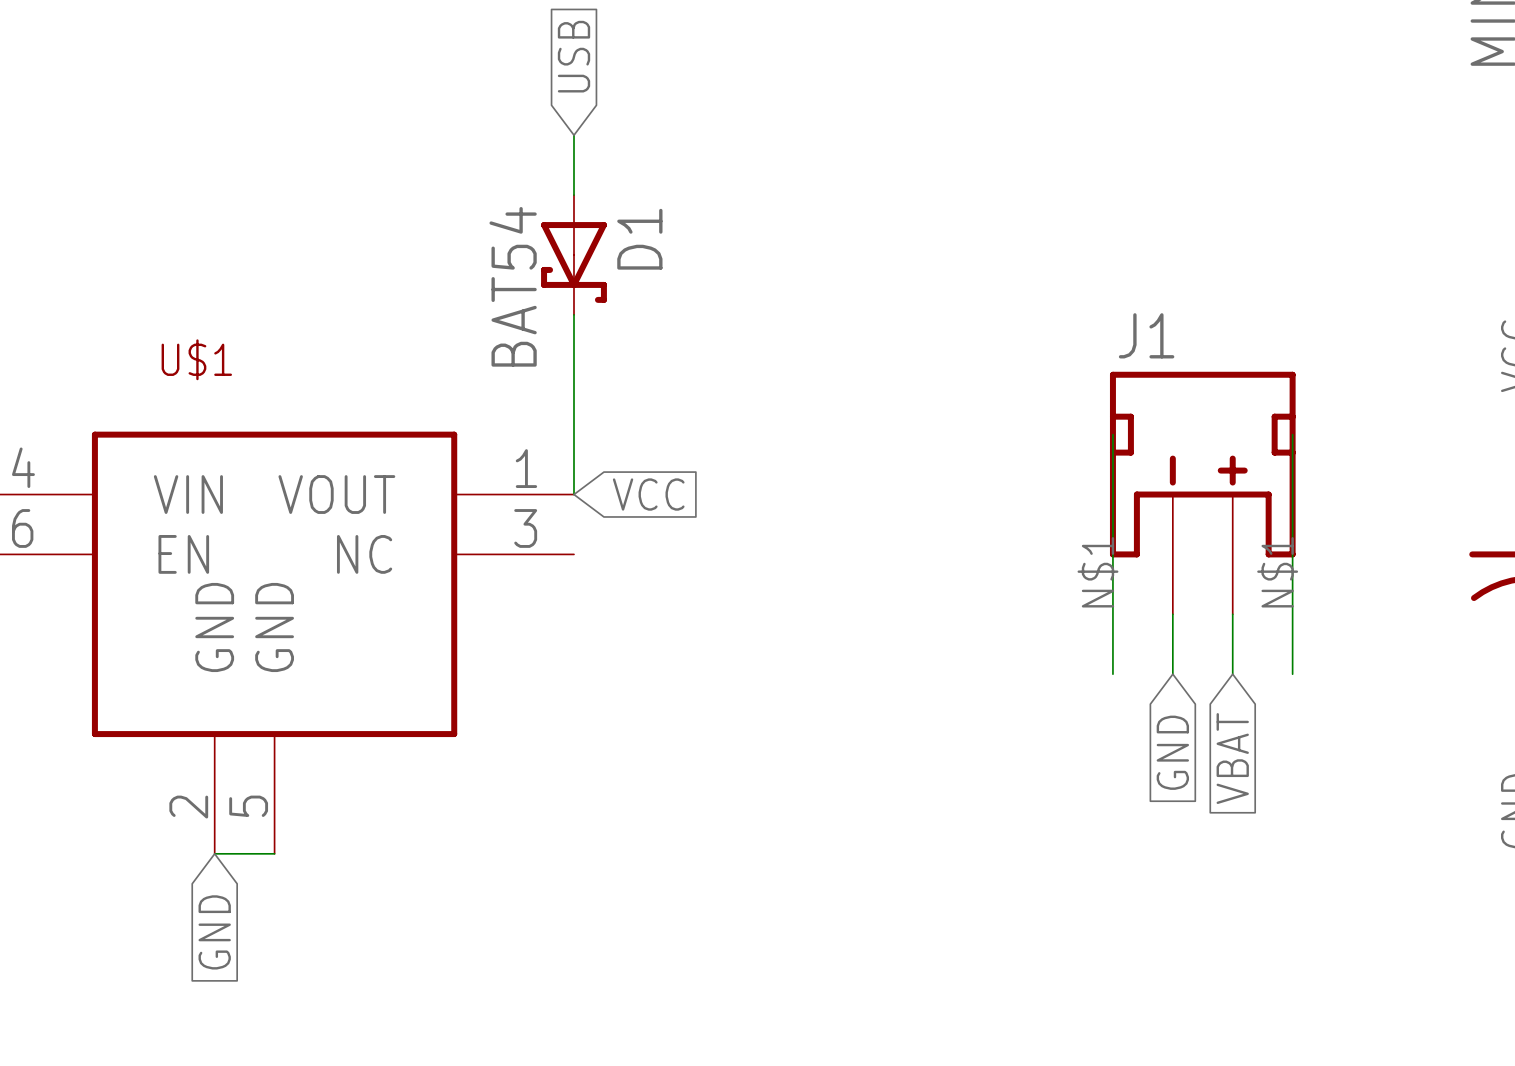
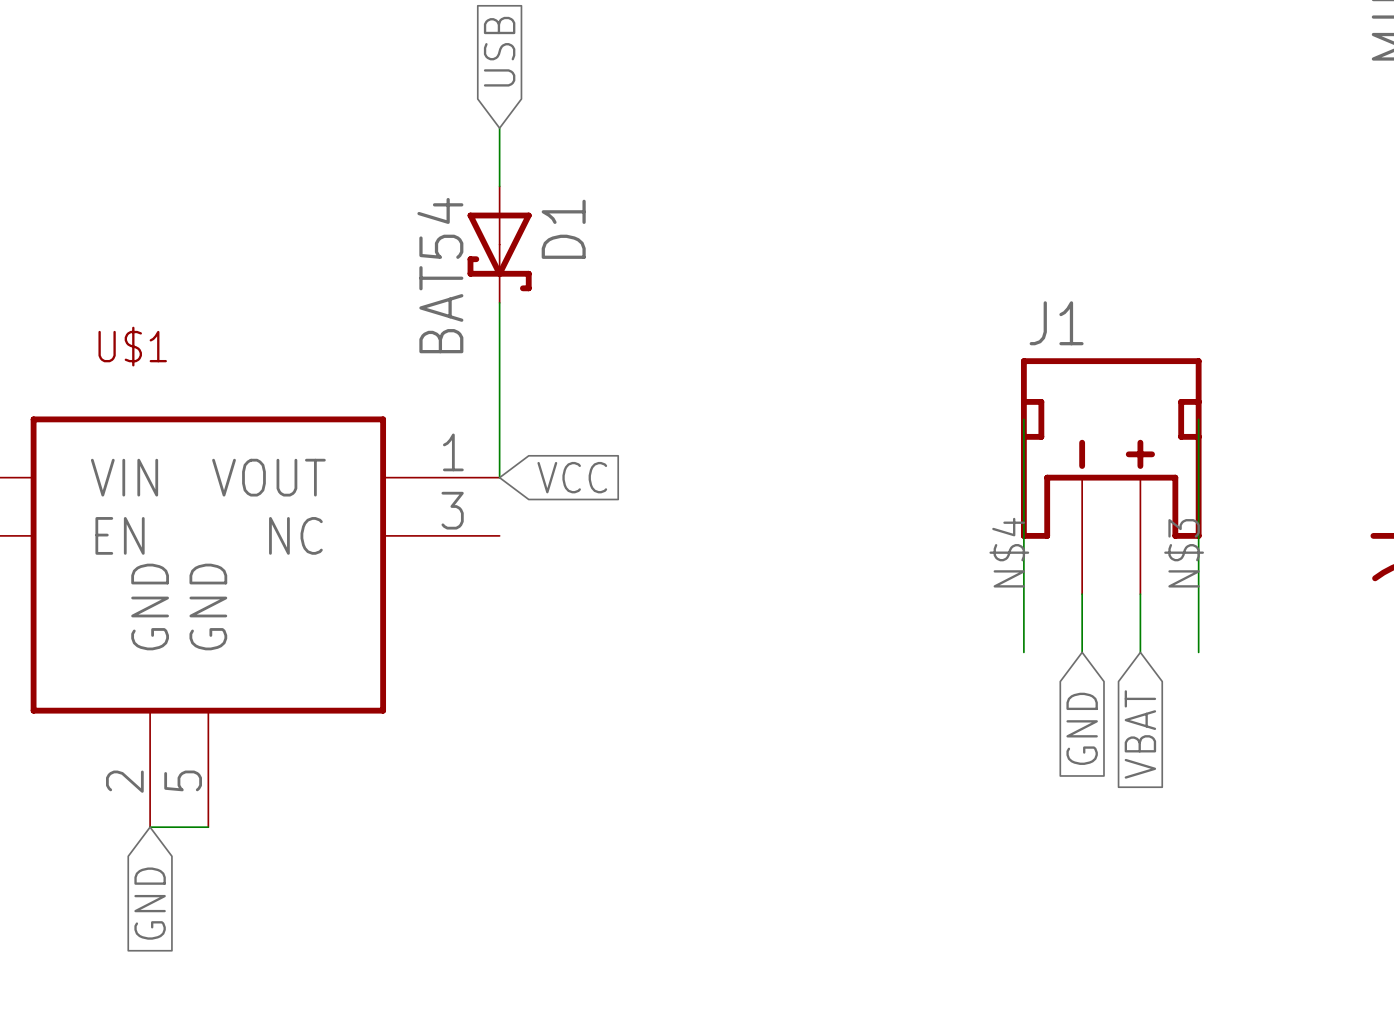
label: N$1 (1097, 572) -> N$4 (1009, 552)
label: N$1 (1277, 572) -> N$3 (1184, 553)

